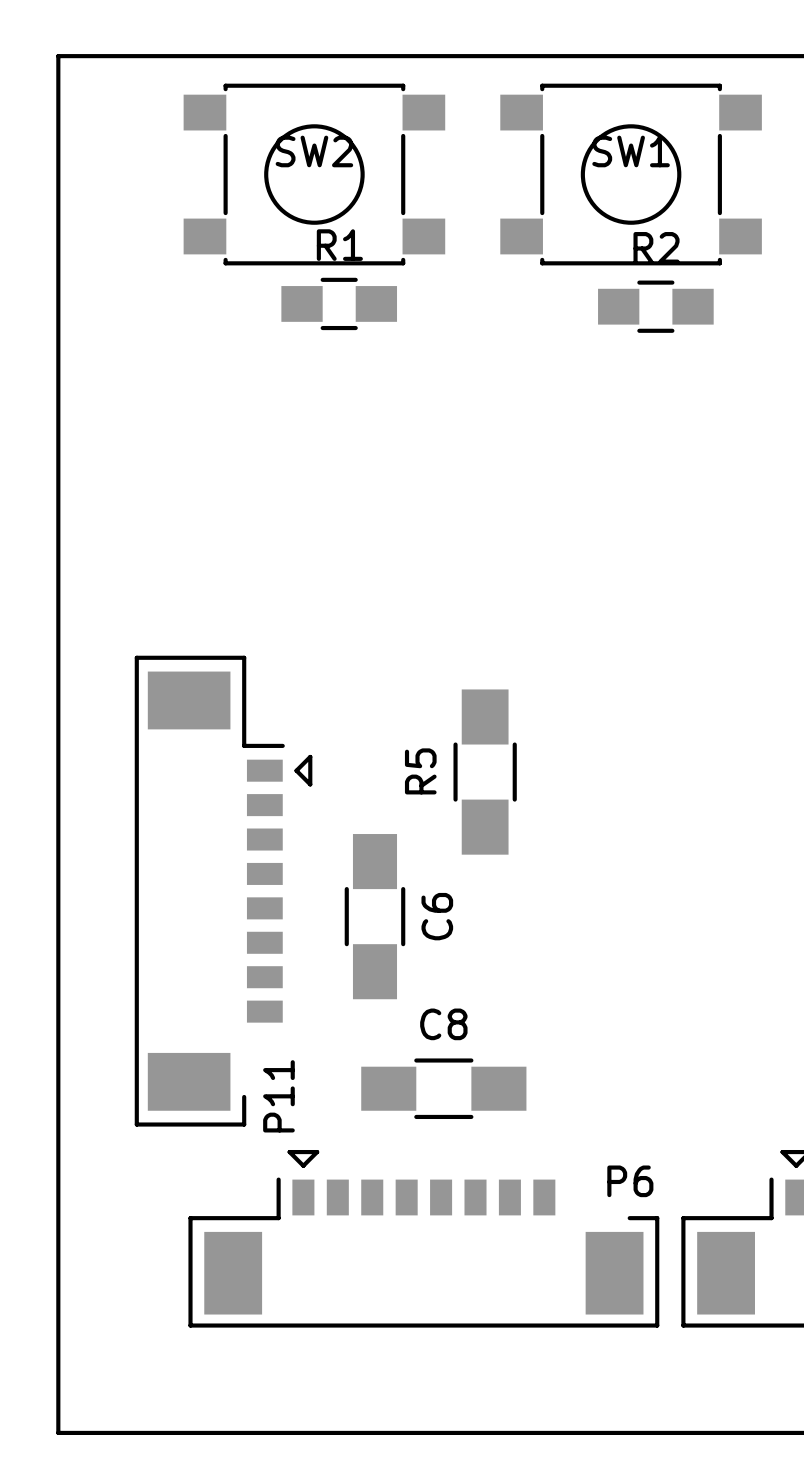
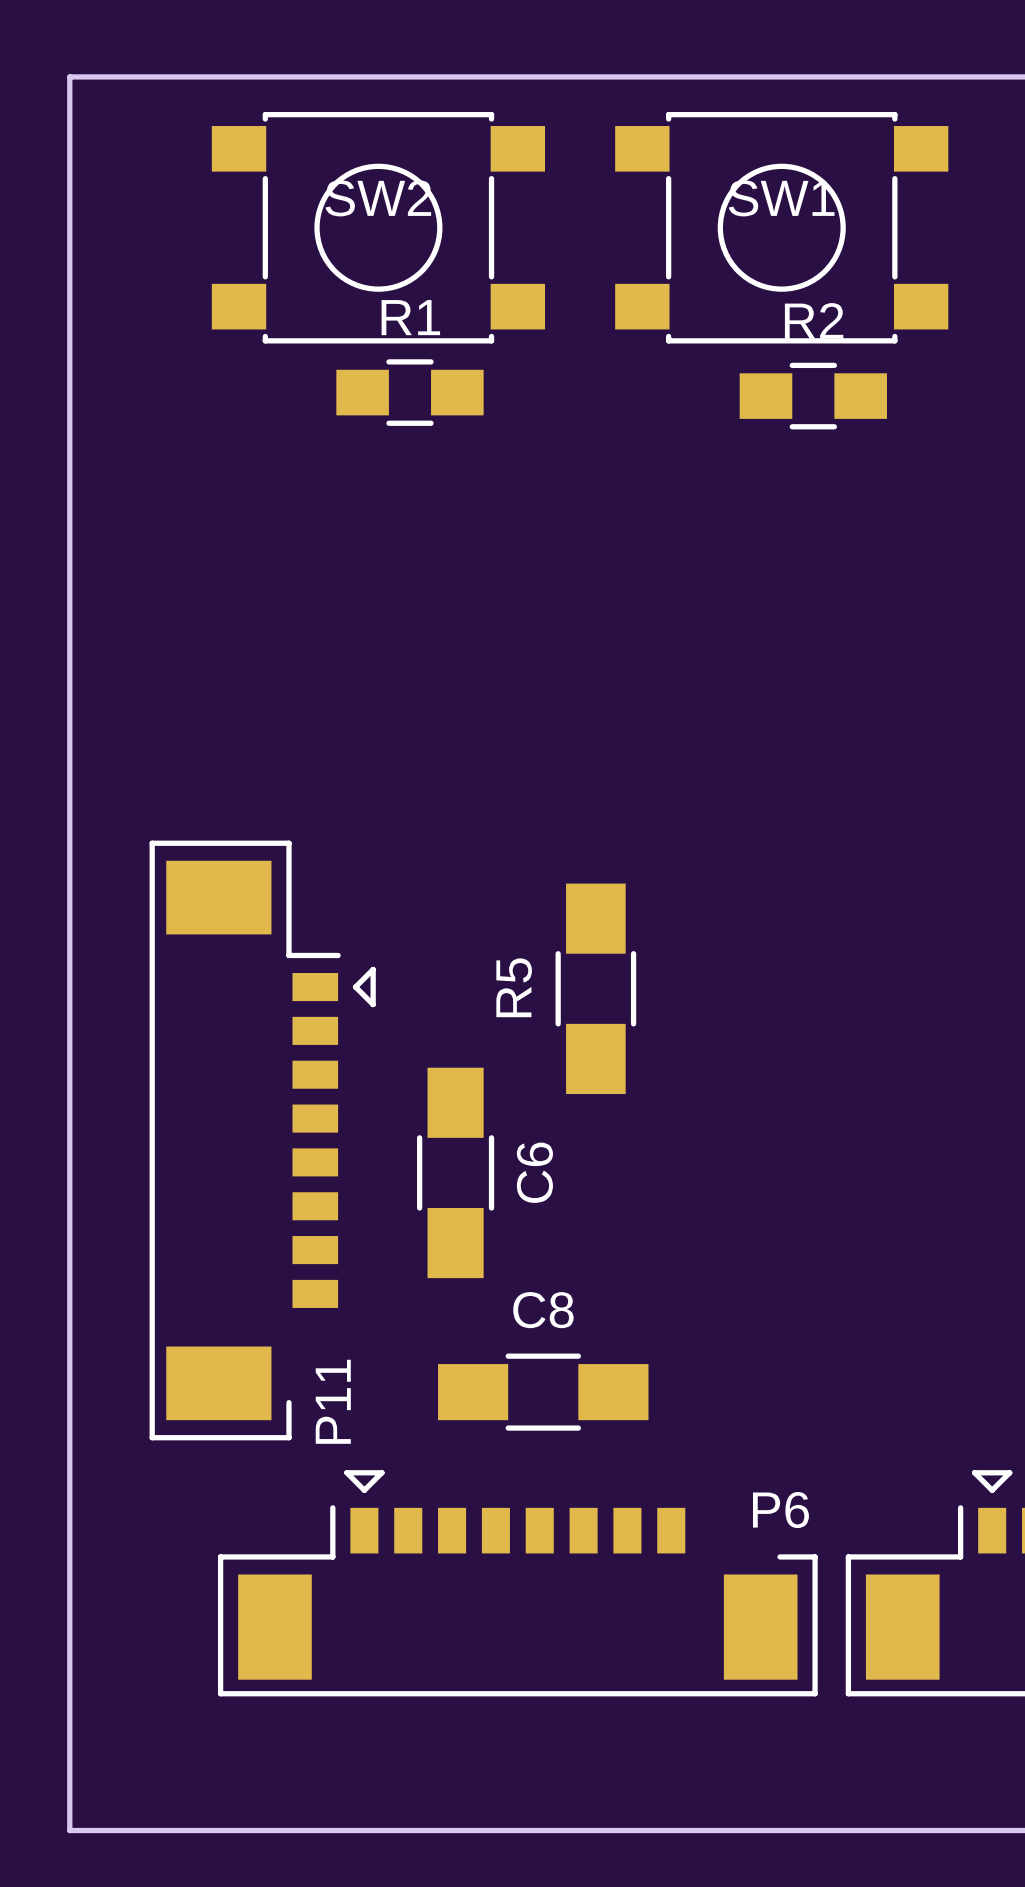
board edge: (72, 56) (58, 56) (58, 1432) (72, 1432) -> (69, 76) (69, 1830)

